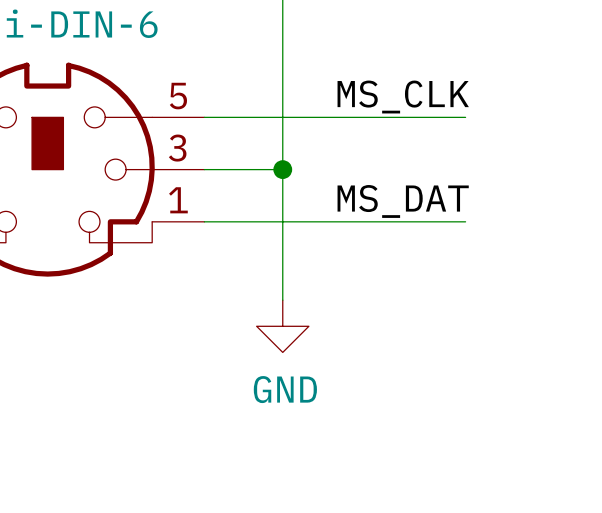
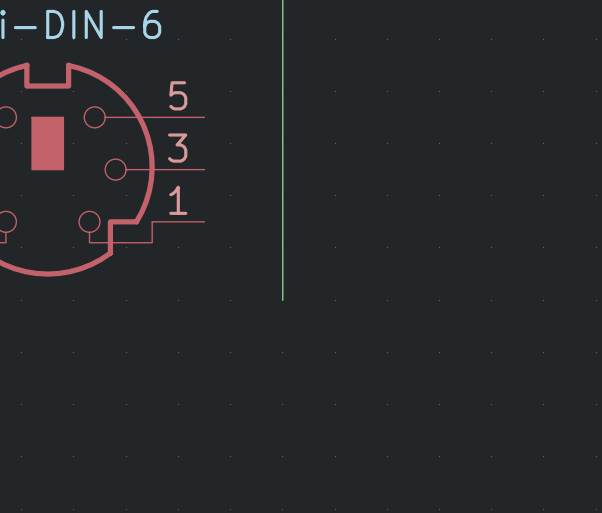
label: MS_CLK (403, 97) -> none
wire: (204, 117) (465, 117) -> none
wire: (204, 169) (282, 169) -> none
junction: (282, 169) -> none
label: MS_DAT (403, 201) -> none
wire: (204, 221) (465, 221) -> none
power symbol: GND (282, 326) -> none

